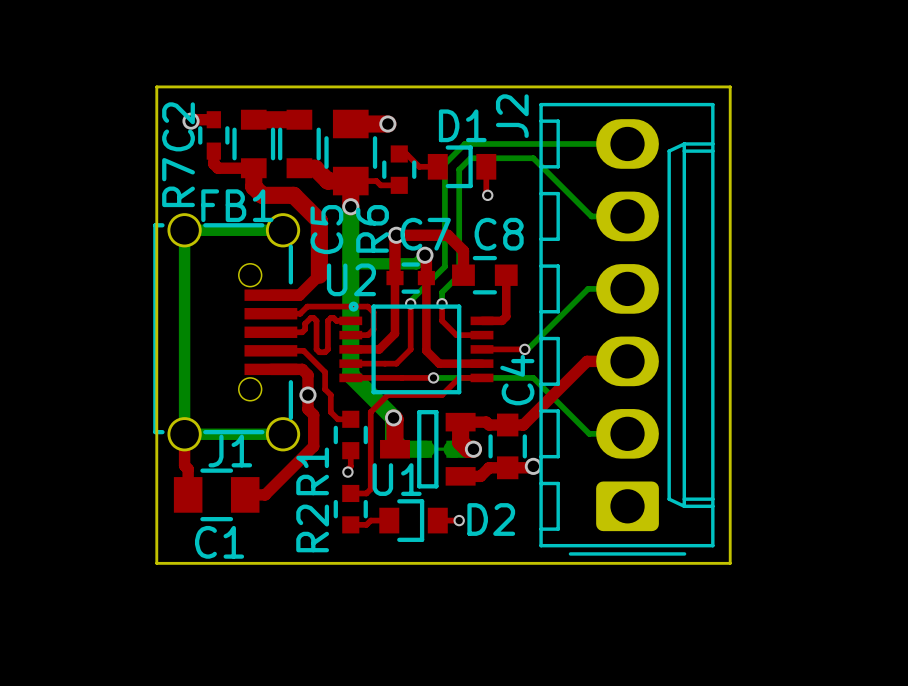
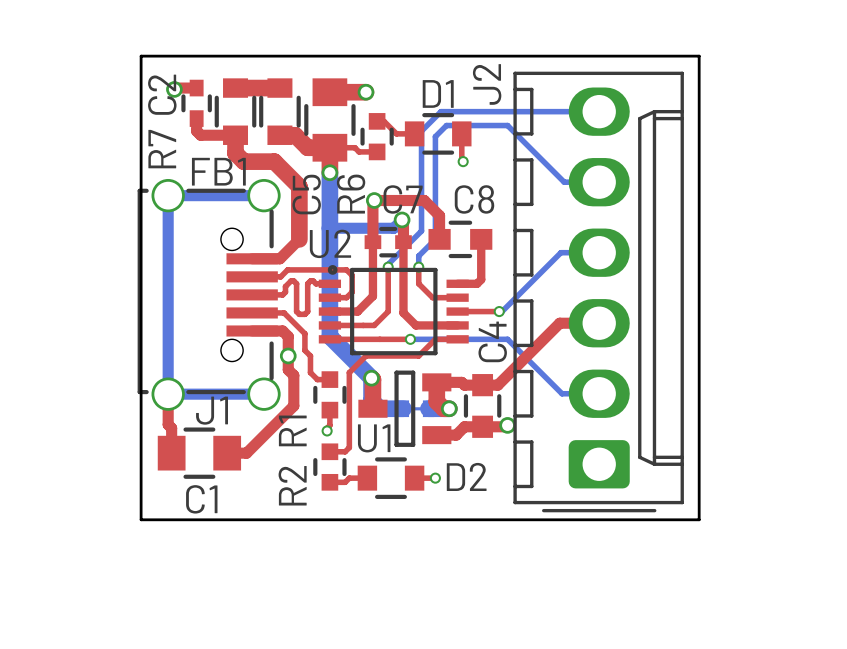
D1 footprint: [427, 145, 497, 189] -> [404, 113, 472, 155]
D2 footprint: [379, 499, 448, 542] -> [357, 457, 425, 499]

